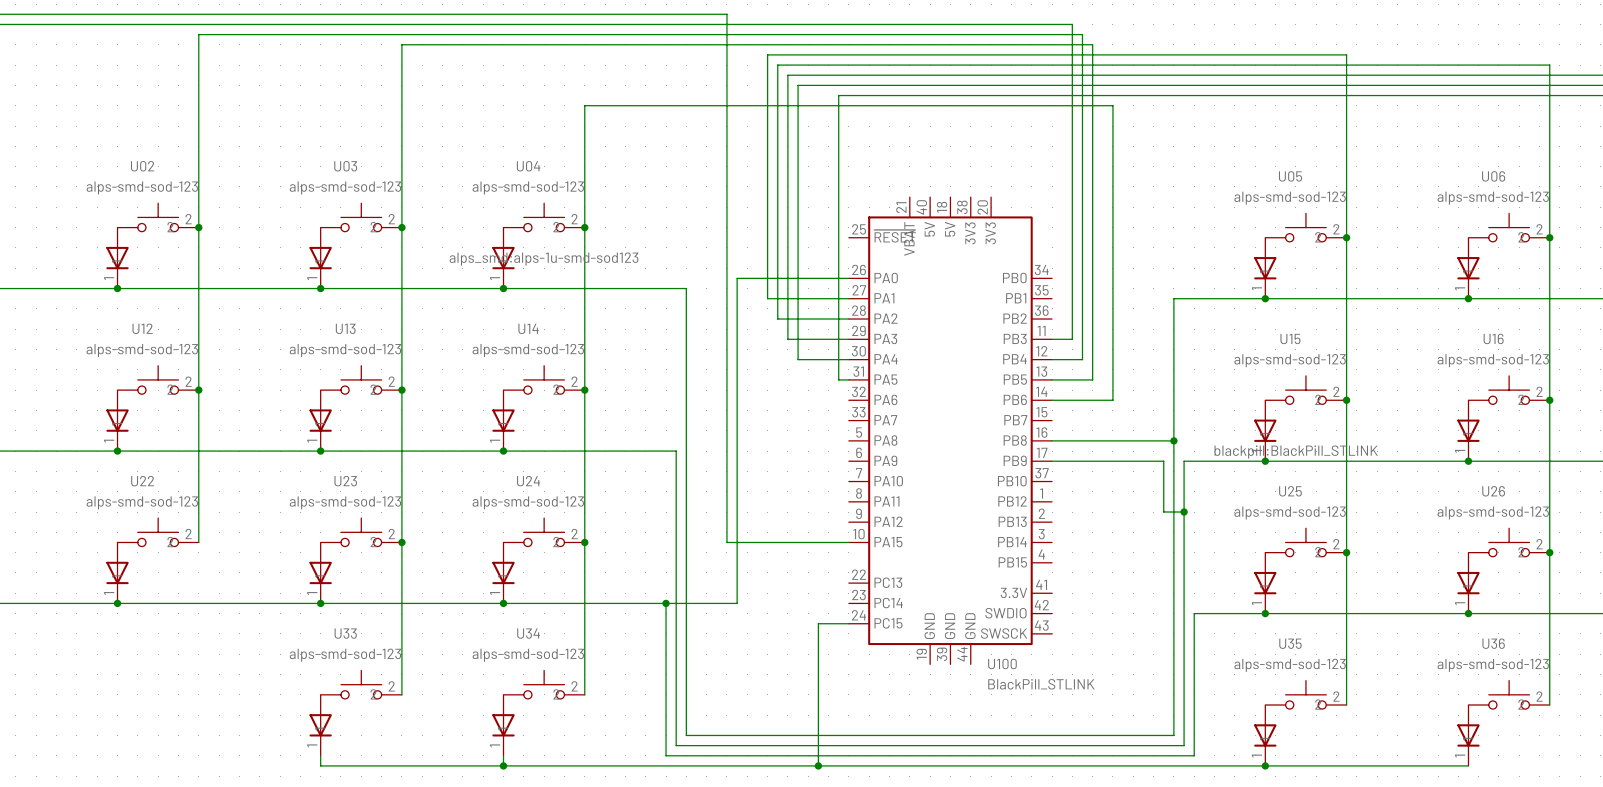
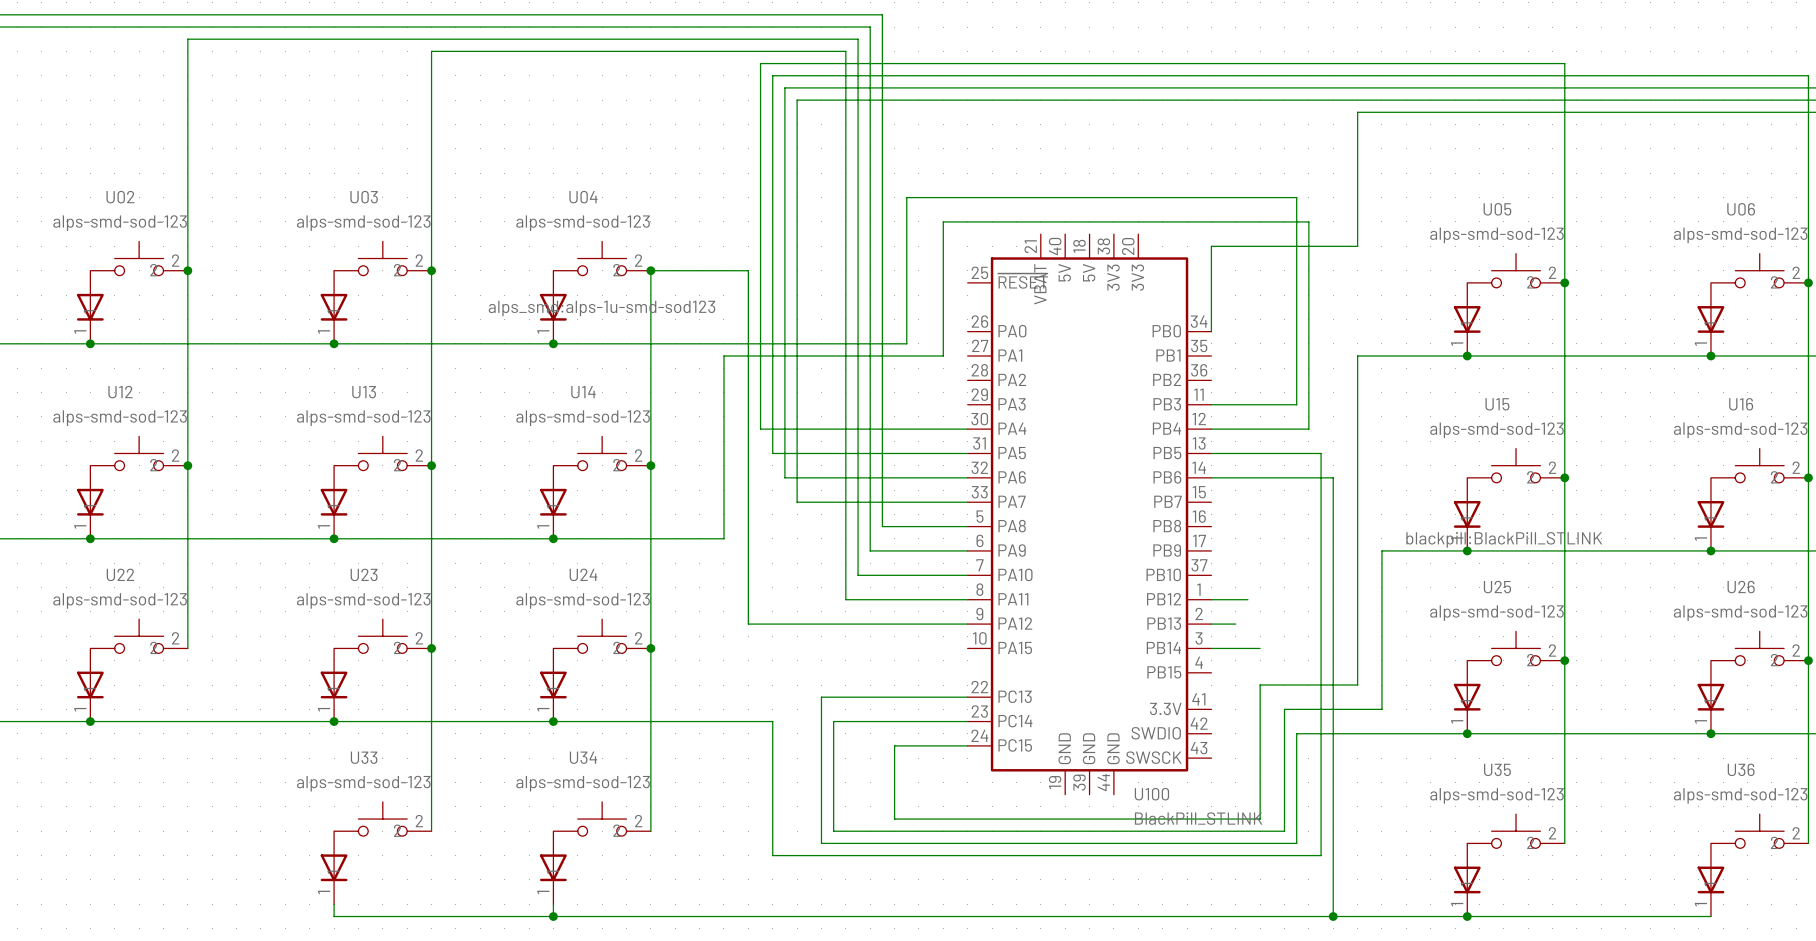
wire: (726, 14) (726, 542) (848, 542) -> (821, 14) (882, 14) (882, 75) (772, 75) (772, 343) (906, 343)
wire: (767, 24) (1072, 24) (1072, 339) -> (906, 197) (1296, 197) (1296, 404) (1235, 404)
wire: (757, 34) (1082, 34) (1082, 359) -> (858, 39) (858, 575) (967, 575)
wire: (747, 44) (1092, 44) (1092, 379) -> (845, 51) (845, 599) (967, 599)
wire: (787, 75) (787, 339) (848, 339) -> (894, 87) (784, 87) (784, 477) (967, 477)
wire: (798, 85) (798, 166) -> (906, 100) (797, 100) (797, 502) (967, 502)
wire: (1173, 95) (838, 95) (838, 379) -> (1357, 112) (1357, 246) (1211, 246) (1211, 331)
wire: (584, 227) (584, 105) (1112, 105) (1112, 400) -> (650, 270) (748, 270) (748, 624) (967, 624)
wire: (848, 278) (737, 278) (737, 603) (686, 603) (686, 379) -> (955, 453) (772, 453)
wire: (798, 288) (798, 359) -> (870, 27) (870, 63) (760, 63) (760, 429) (906, 429)
wire: (828, 298) (848, 298) -> (943, 356) (943, 221) (1308, 221) (1308, 429) (1247, 429)
wire: (777, 319) (848, 319) -> (882, 380) (882, 526) (967, 526)
wire: none -> (1260, 453) (1321, 453) (1321, 855) (772, 855)
wire: none -> (1284, 477) (1333, 477) (1333, 916)
wire: (1052, 440) (1173, 440) -> none
junction: (1173, 440) -> none
wire: (645, 451) (676, 451) (676, 745) (1184, 745) (1184, 461) (1194, 461) -> (967, 721) (833, 721) (833, 831) (1284, 831) (1284, 709) (1381, 709) (1381, 550)
wire: none -> (723, 538) (723, 356) (870, 356) (870, 550) (967, 550)
wire: (1052, 461) (1163, 461) (1163, 512) (1184, 512) -> none
wire: none -> (1211, 599) (1247, 599)
junction: (1184, 512) -> none
wire: none -> (1211, 624) (1235, 624)
wire: none -> (1211, 648) (1260, 648)
wire: (1173, 572) (1173, 735) (686, 735) (686, 715) -> (1357, 685) (1260, 685) (1260, 819) (894, 819) (894, 745) (931, 745)
wire: (666, 603) (666, 755) (1194, 755) (1194, 613) -> (967, 697) (821, 697) (821, 843) (1296, 843) (1296, 733) (1381, 733)
junction: (666, 603) -> none
wire: (818, 623) (818, 765) -> none
junction: (818, 765) -> none
junction: none -> (1333, 916)

